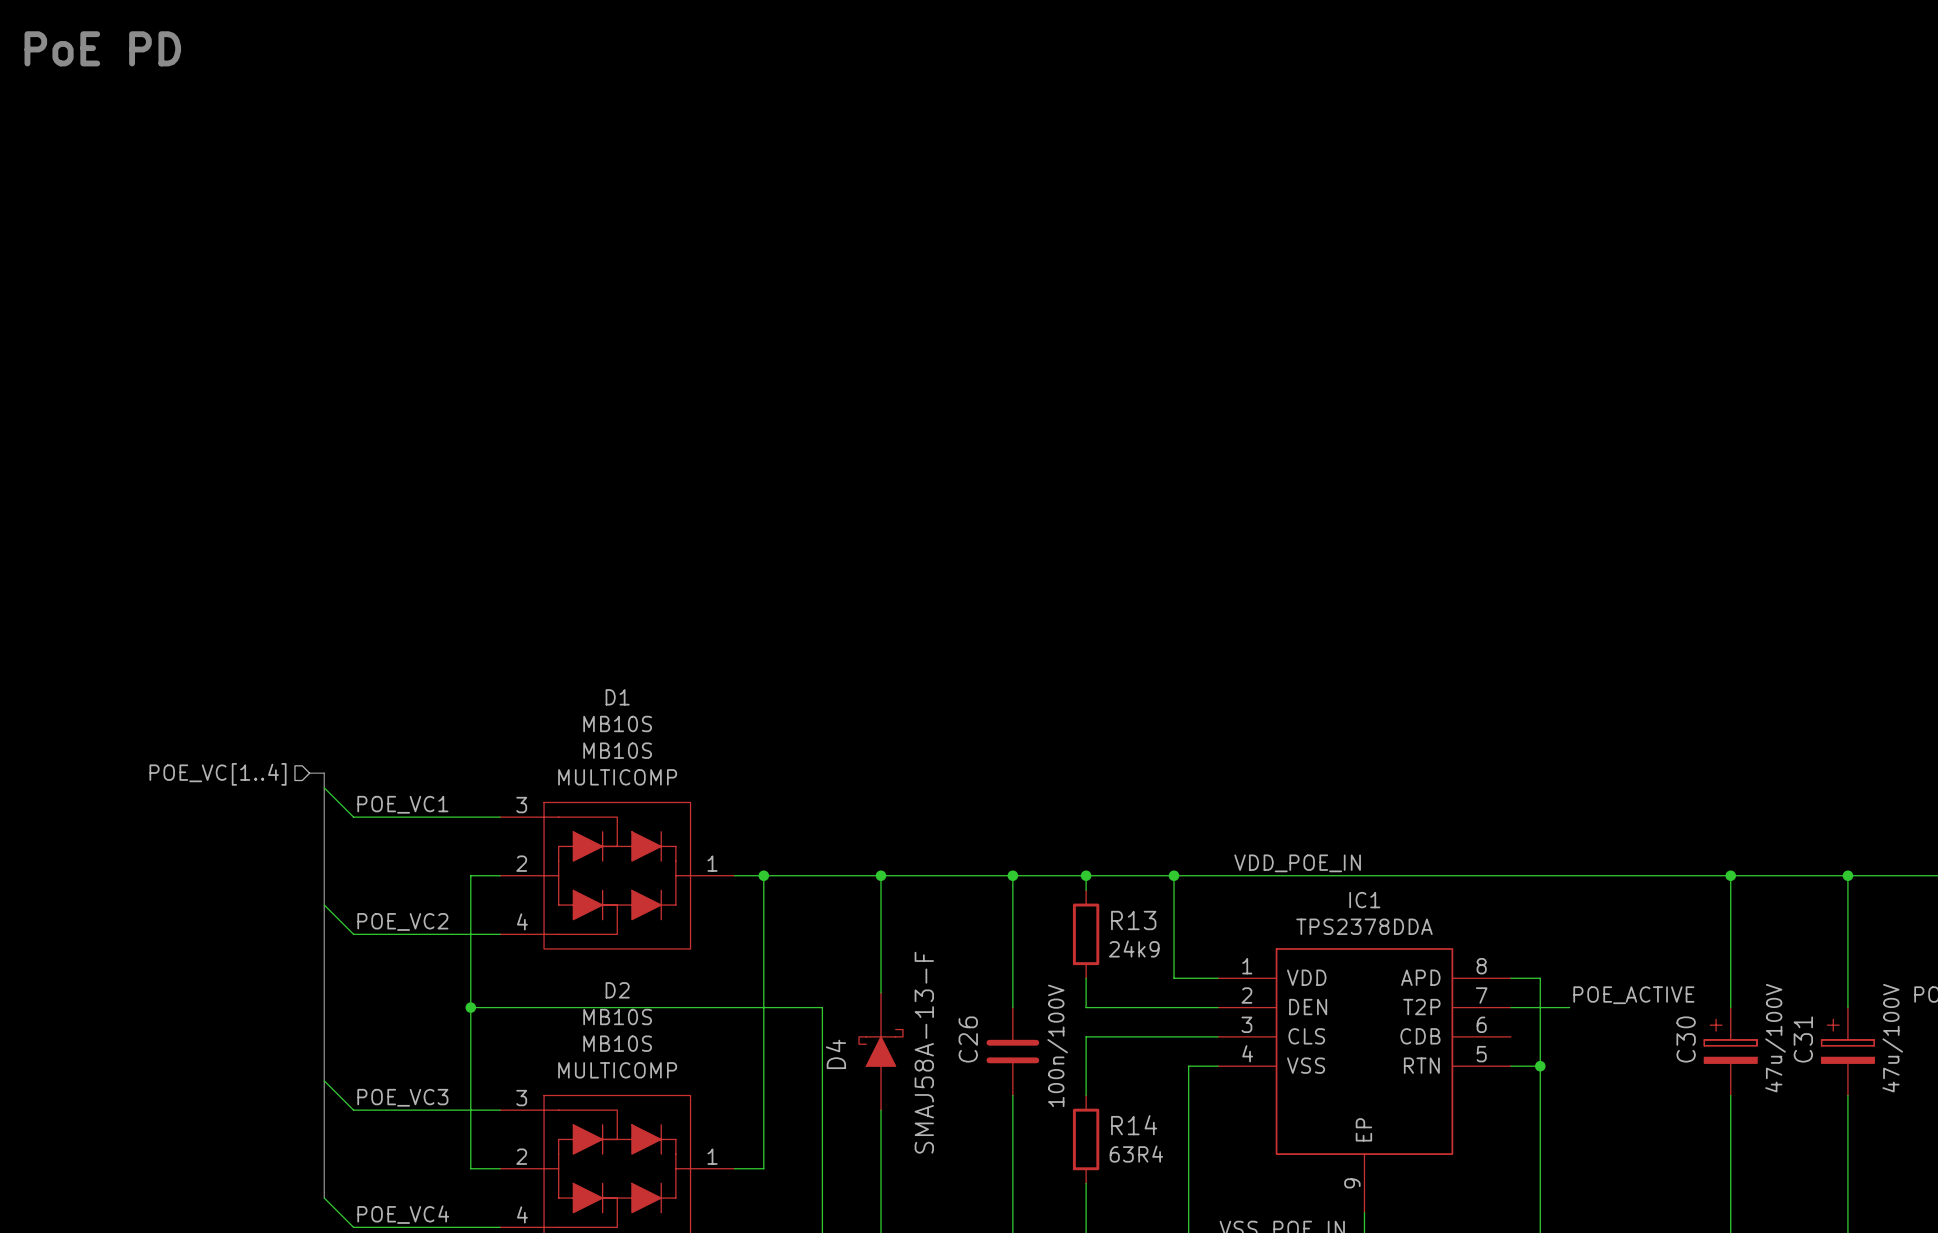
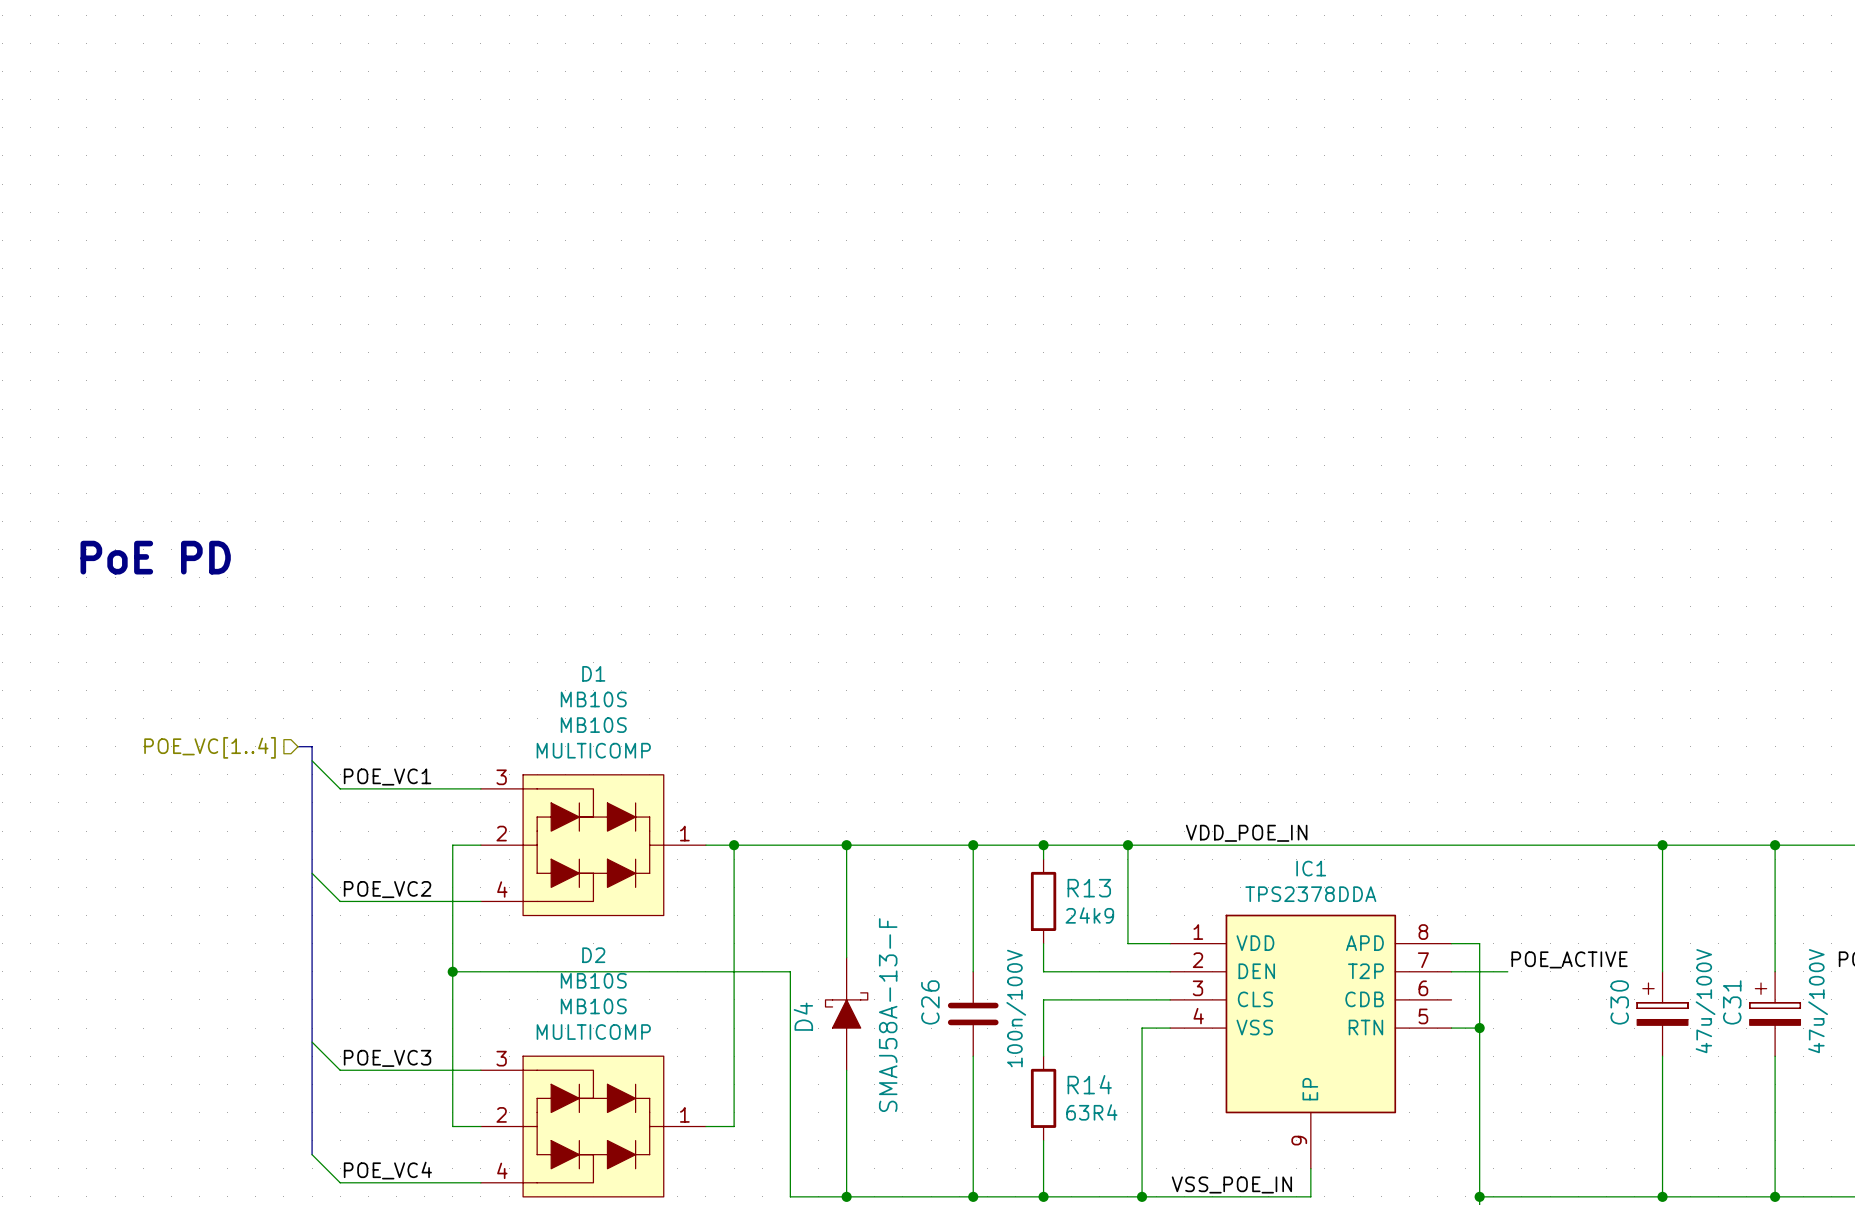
text: PoE PD (102, 48) -> none
text: none -> PoE PD (155, 557)

